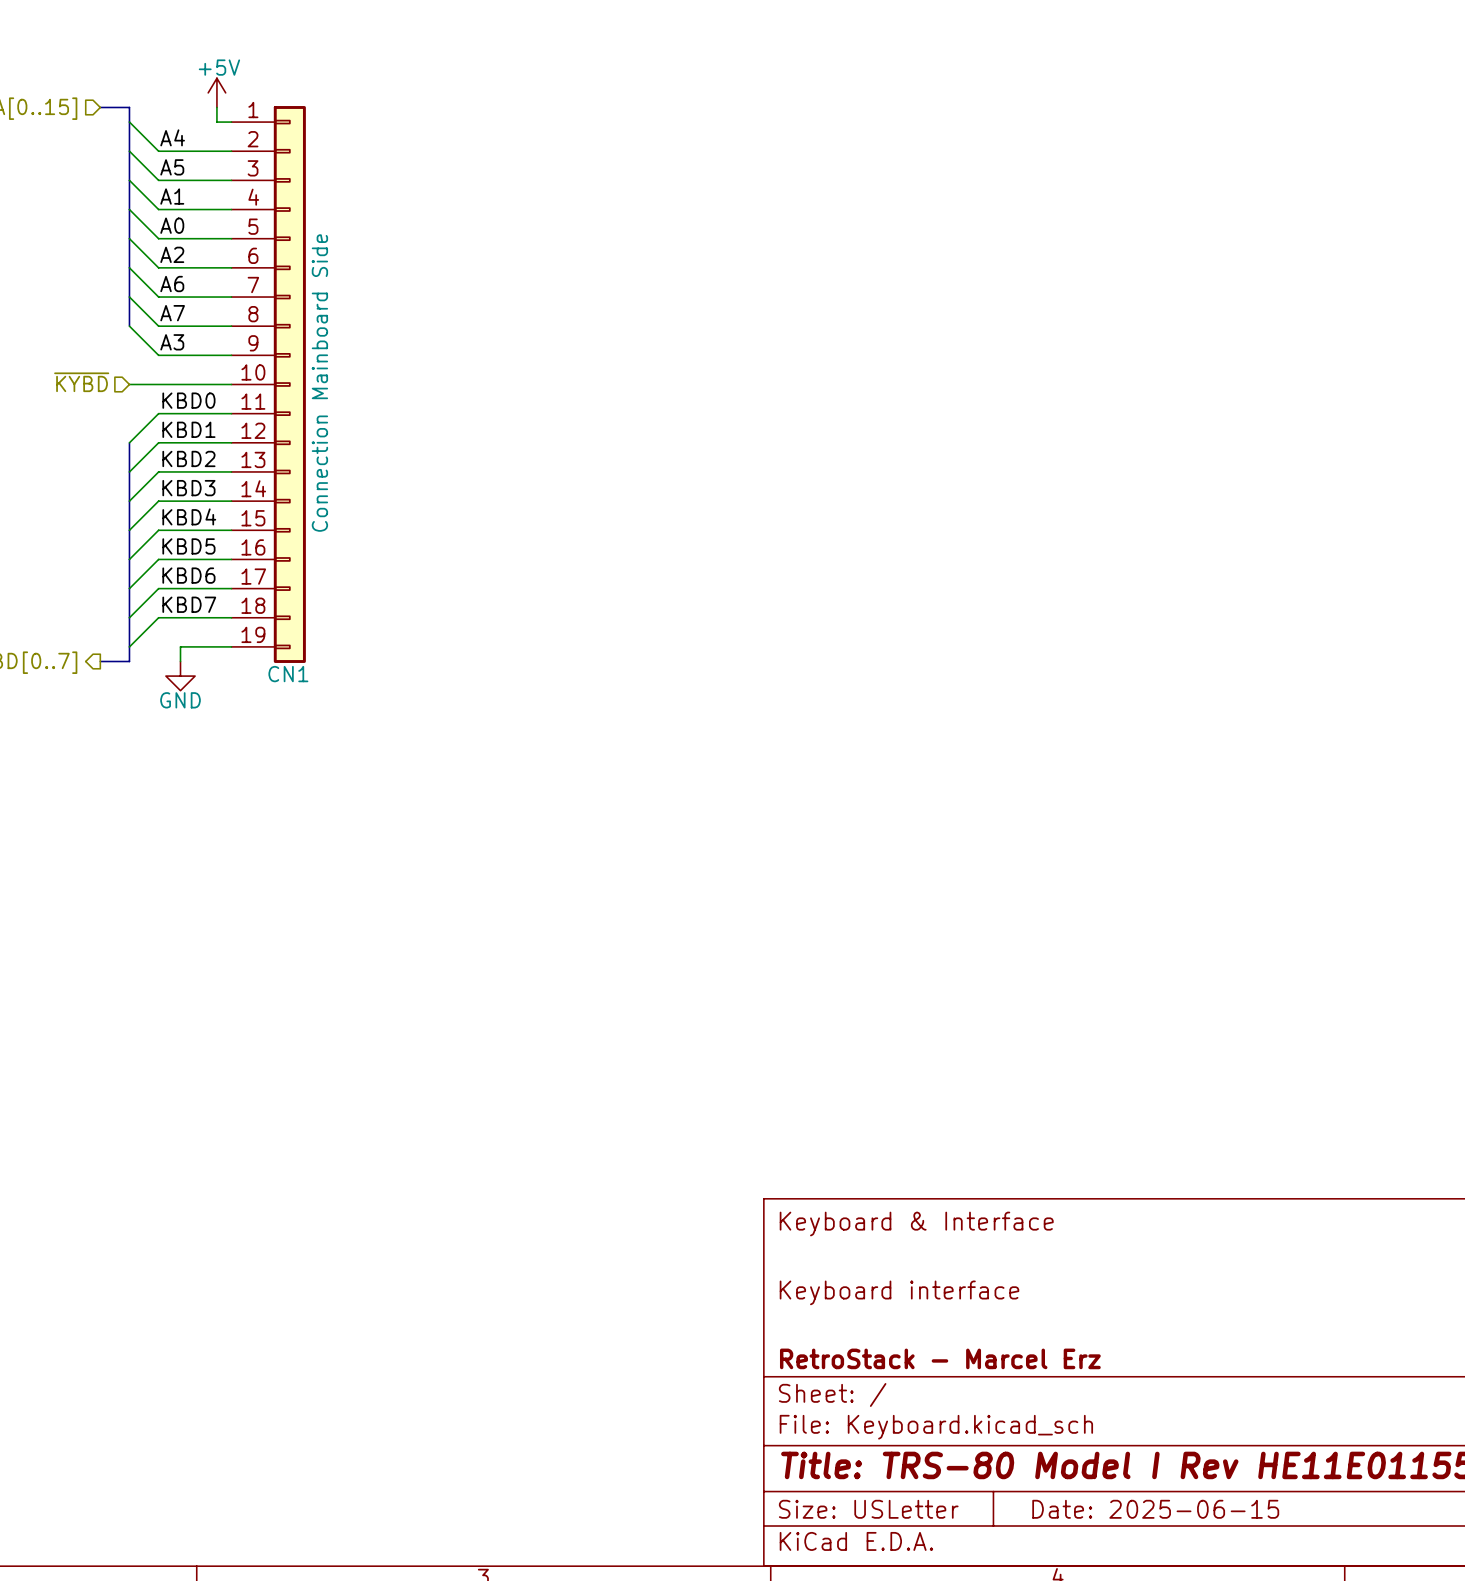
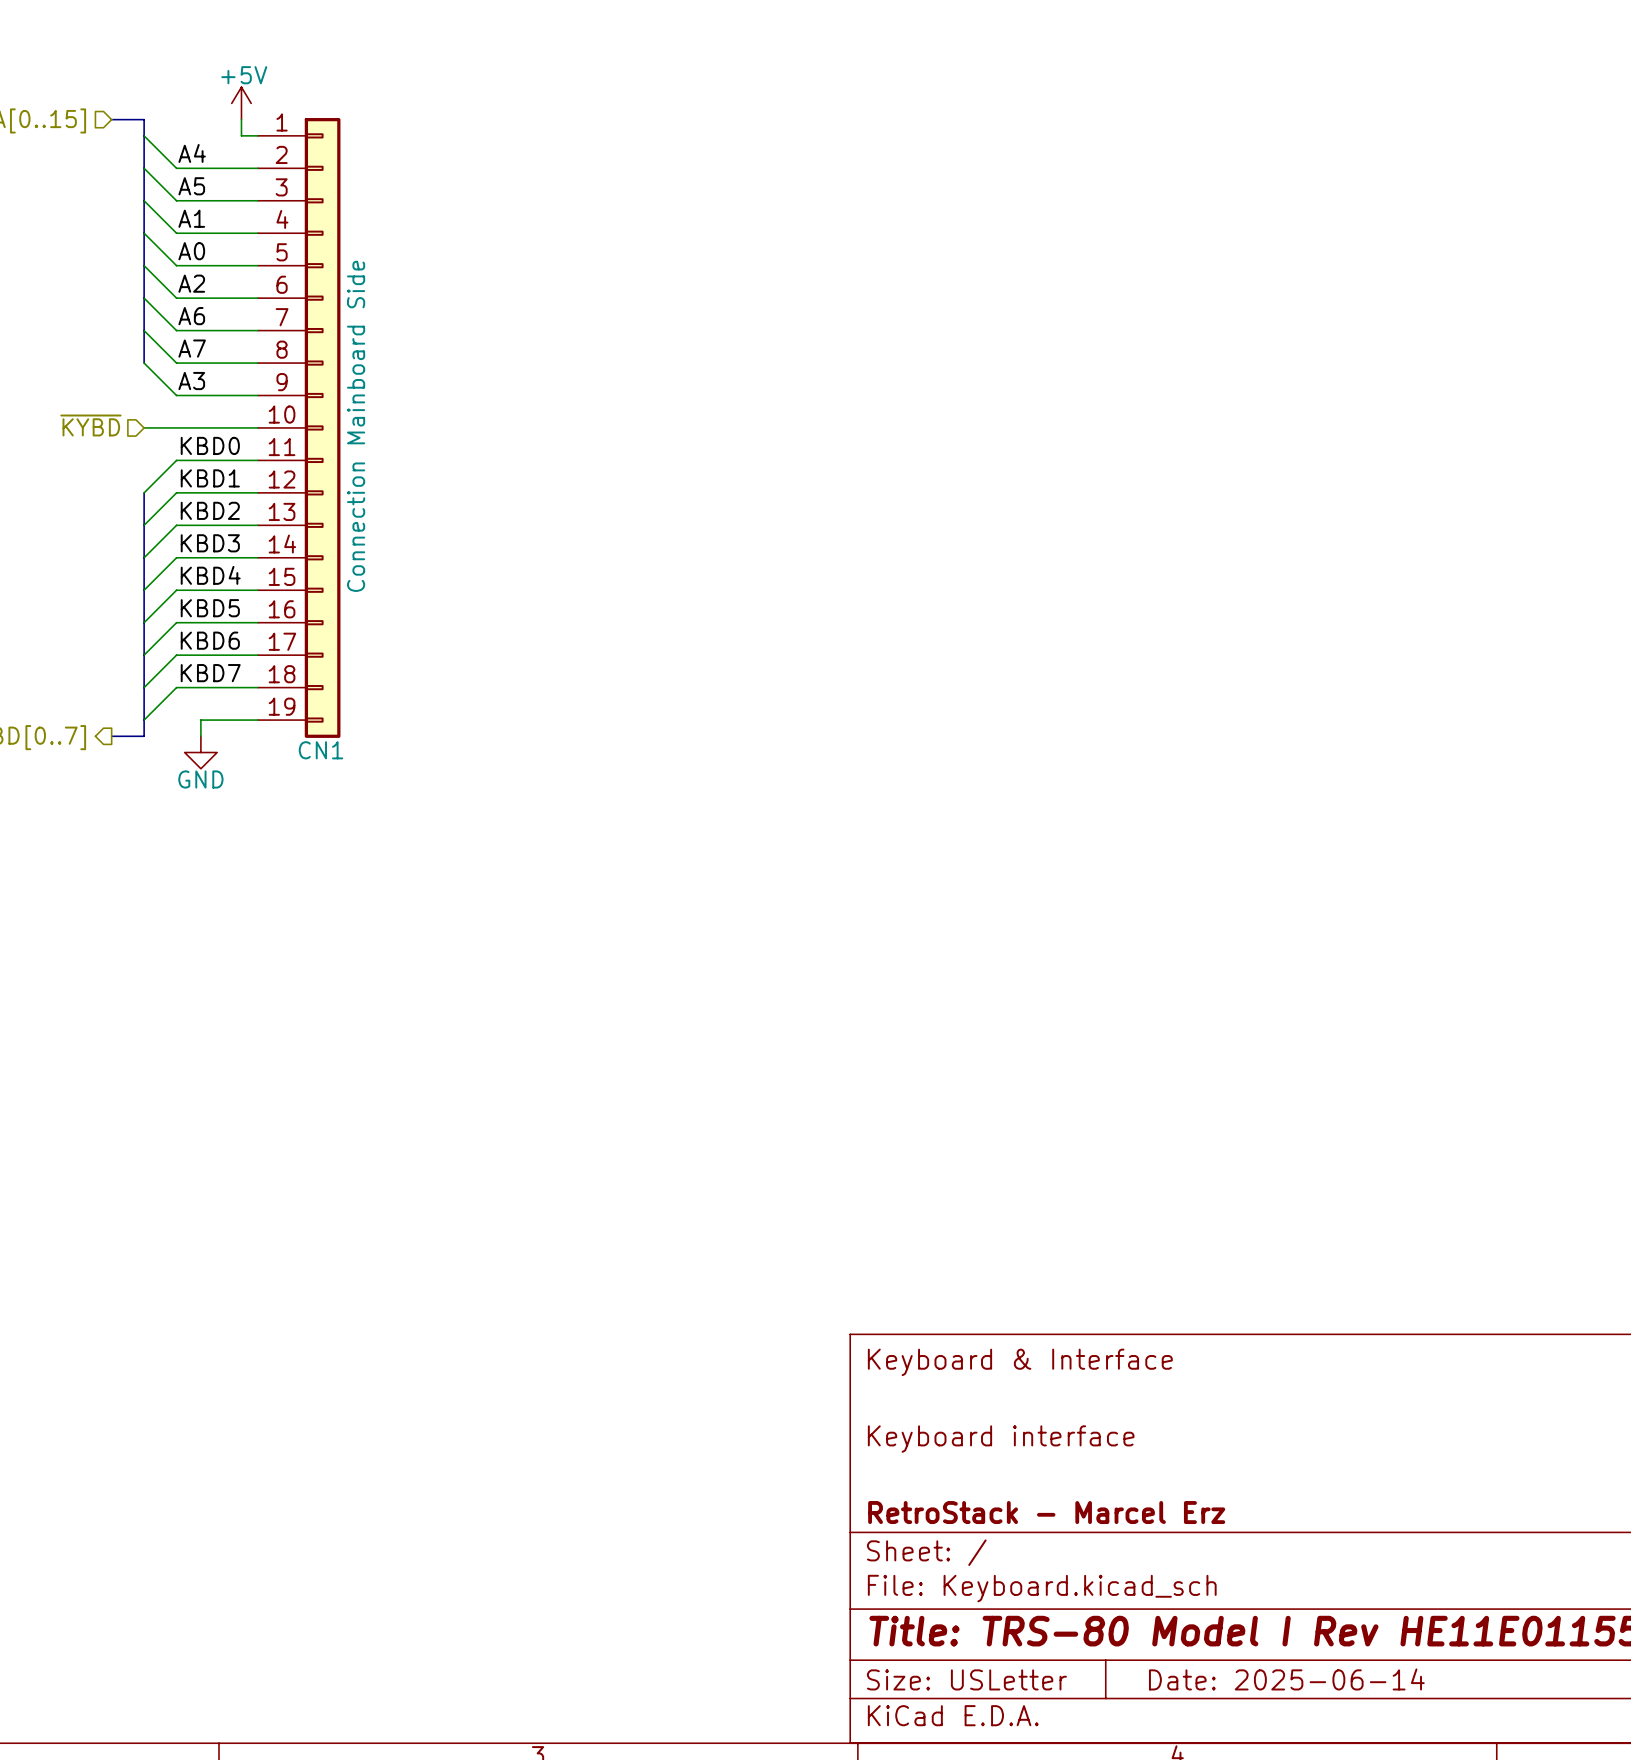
title block: Date: 2025-06-15 (1155, 1509) -> Date: 2025-06-14 (1286, 1679)

